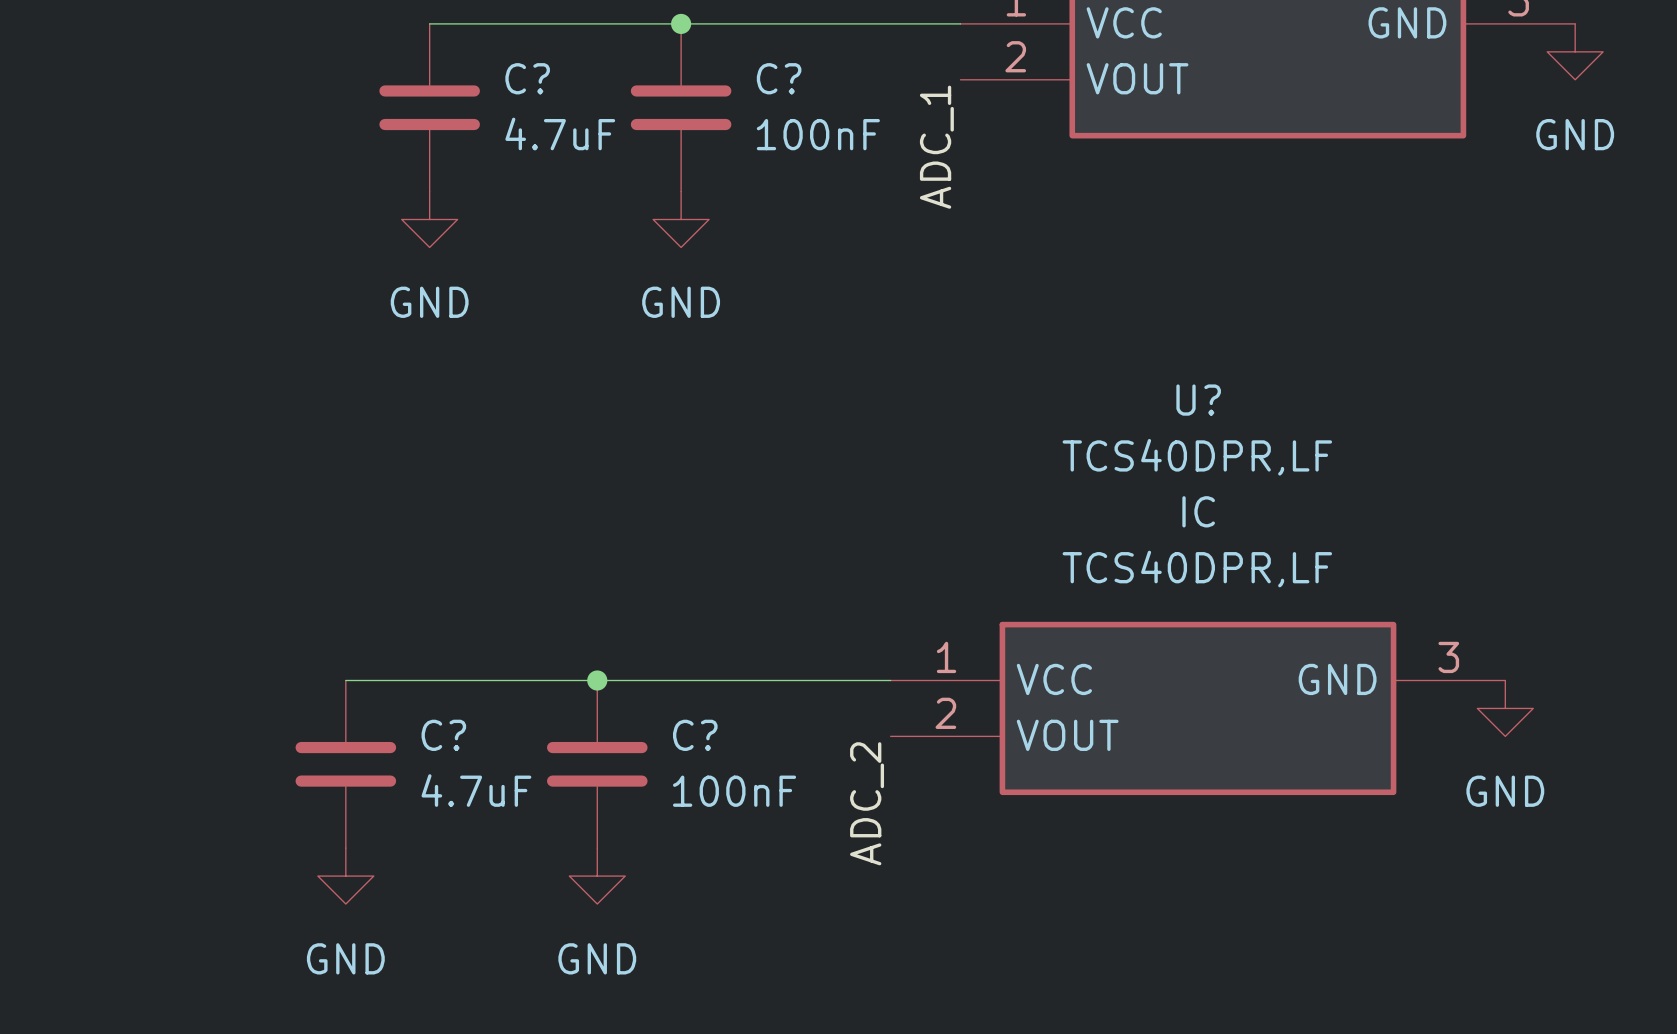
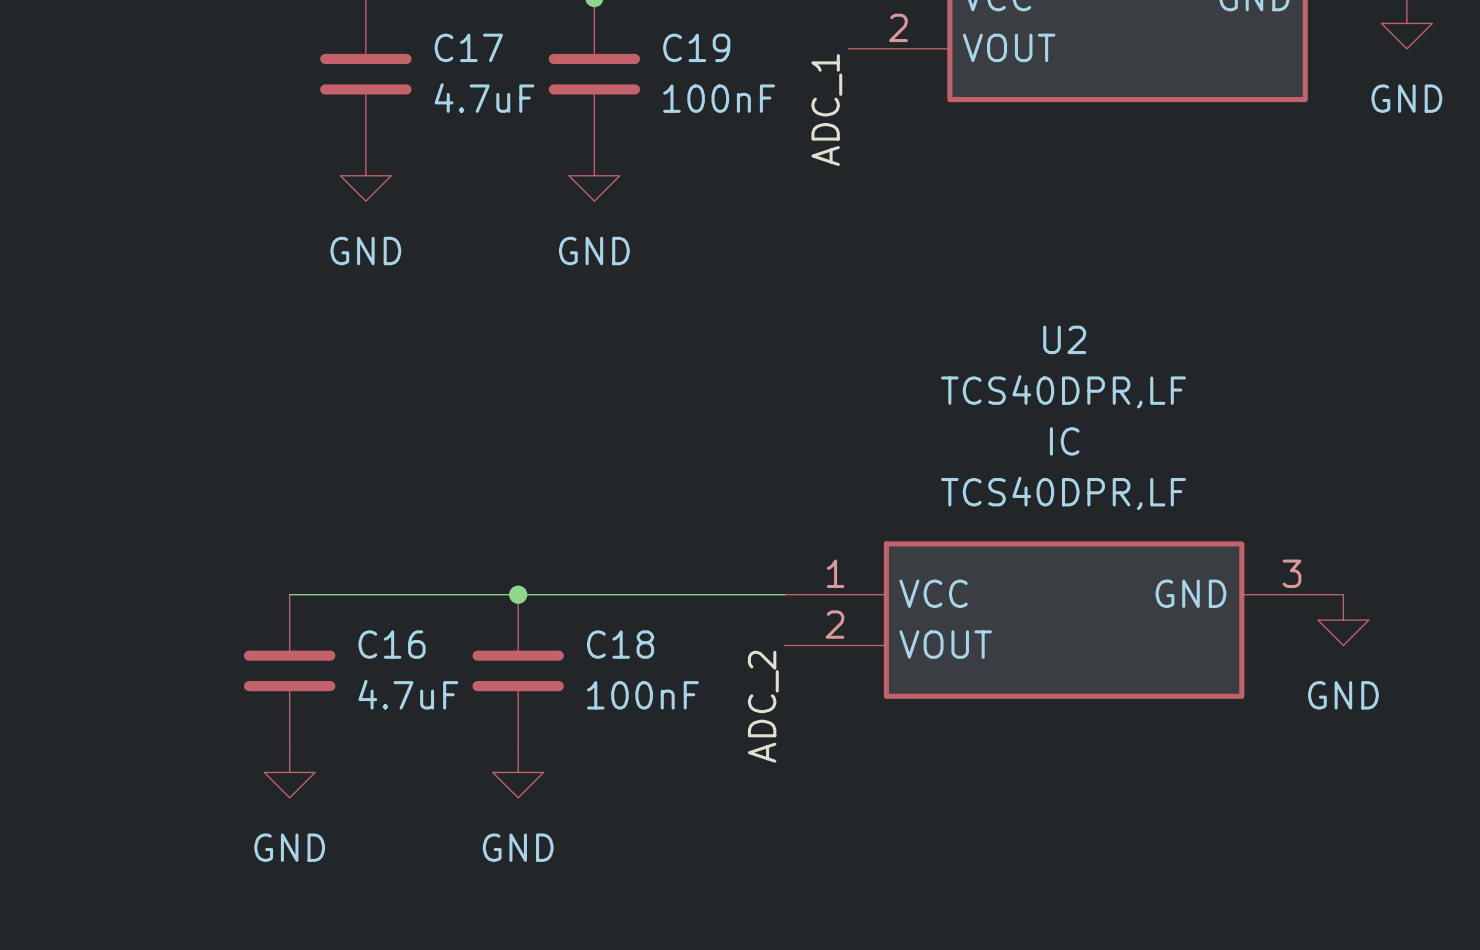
C? name: C? (527, 78) -> C17 (468, 47)
C? name: C? (779, 78) -> C19 (696, 47)
U? name: U? (1198, 400) -> U2 (1064, 339)
C? name: C? (443, 735) -> C16 (392, 644)
C? name: C? (695, 735) -> C18 (620, 644)

